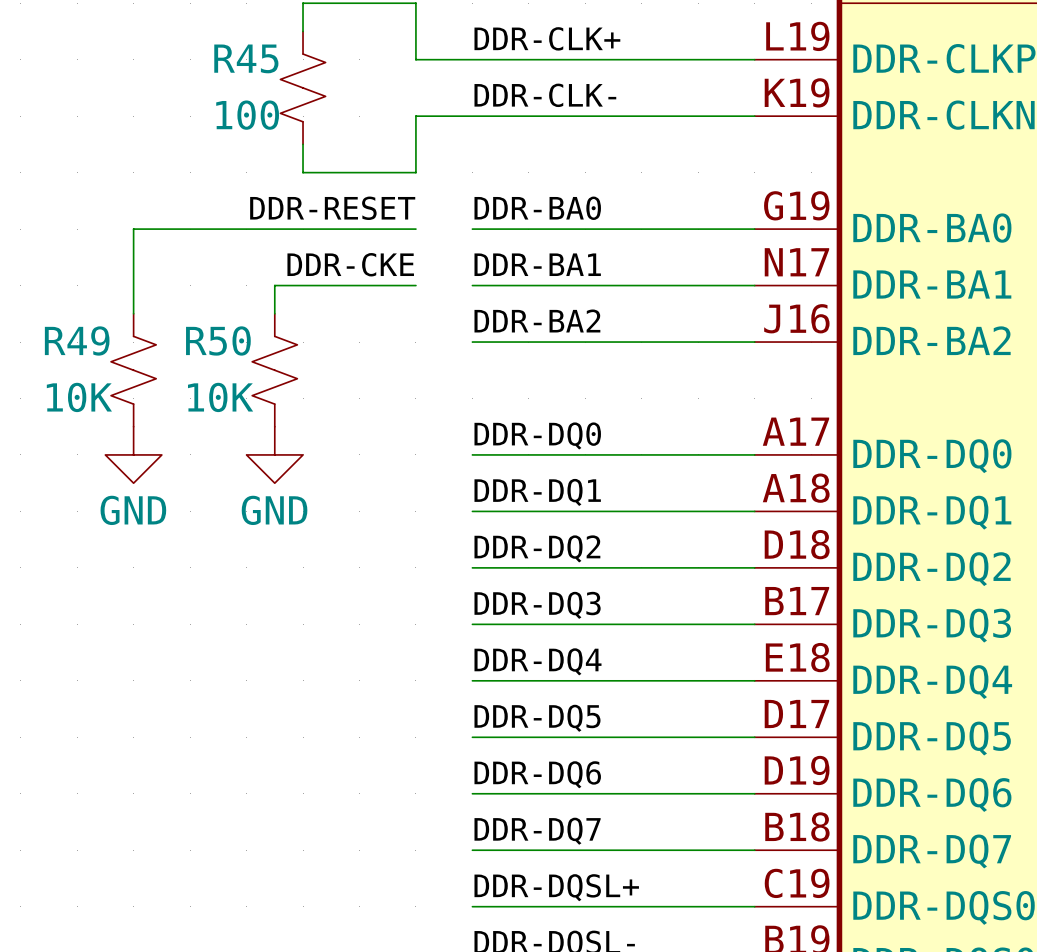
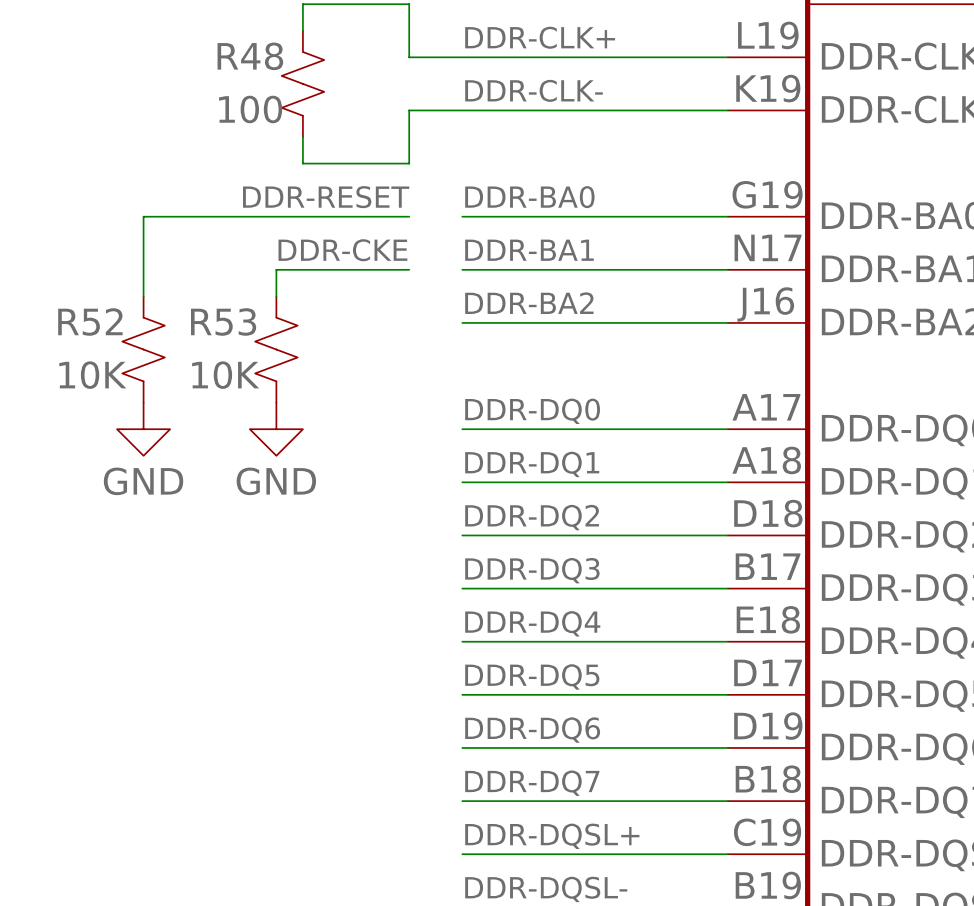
R45 name: R45 (246, 58) -> R48 (250, 56)
R49 name: R49 (77, 340) -> R52 (90, 321)
R50 name: R50 (218, 340) -> R53 (223, 321)

